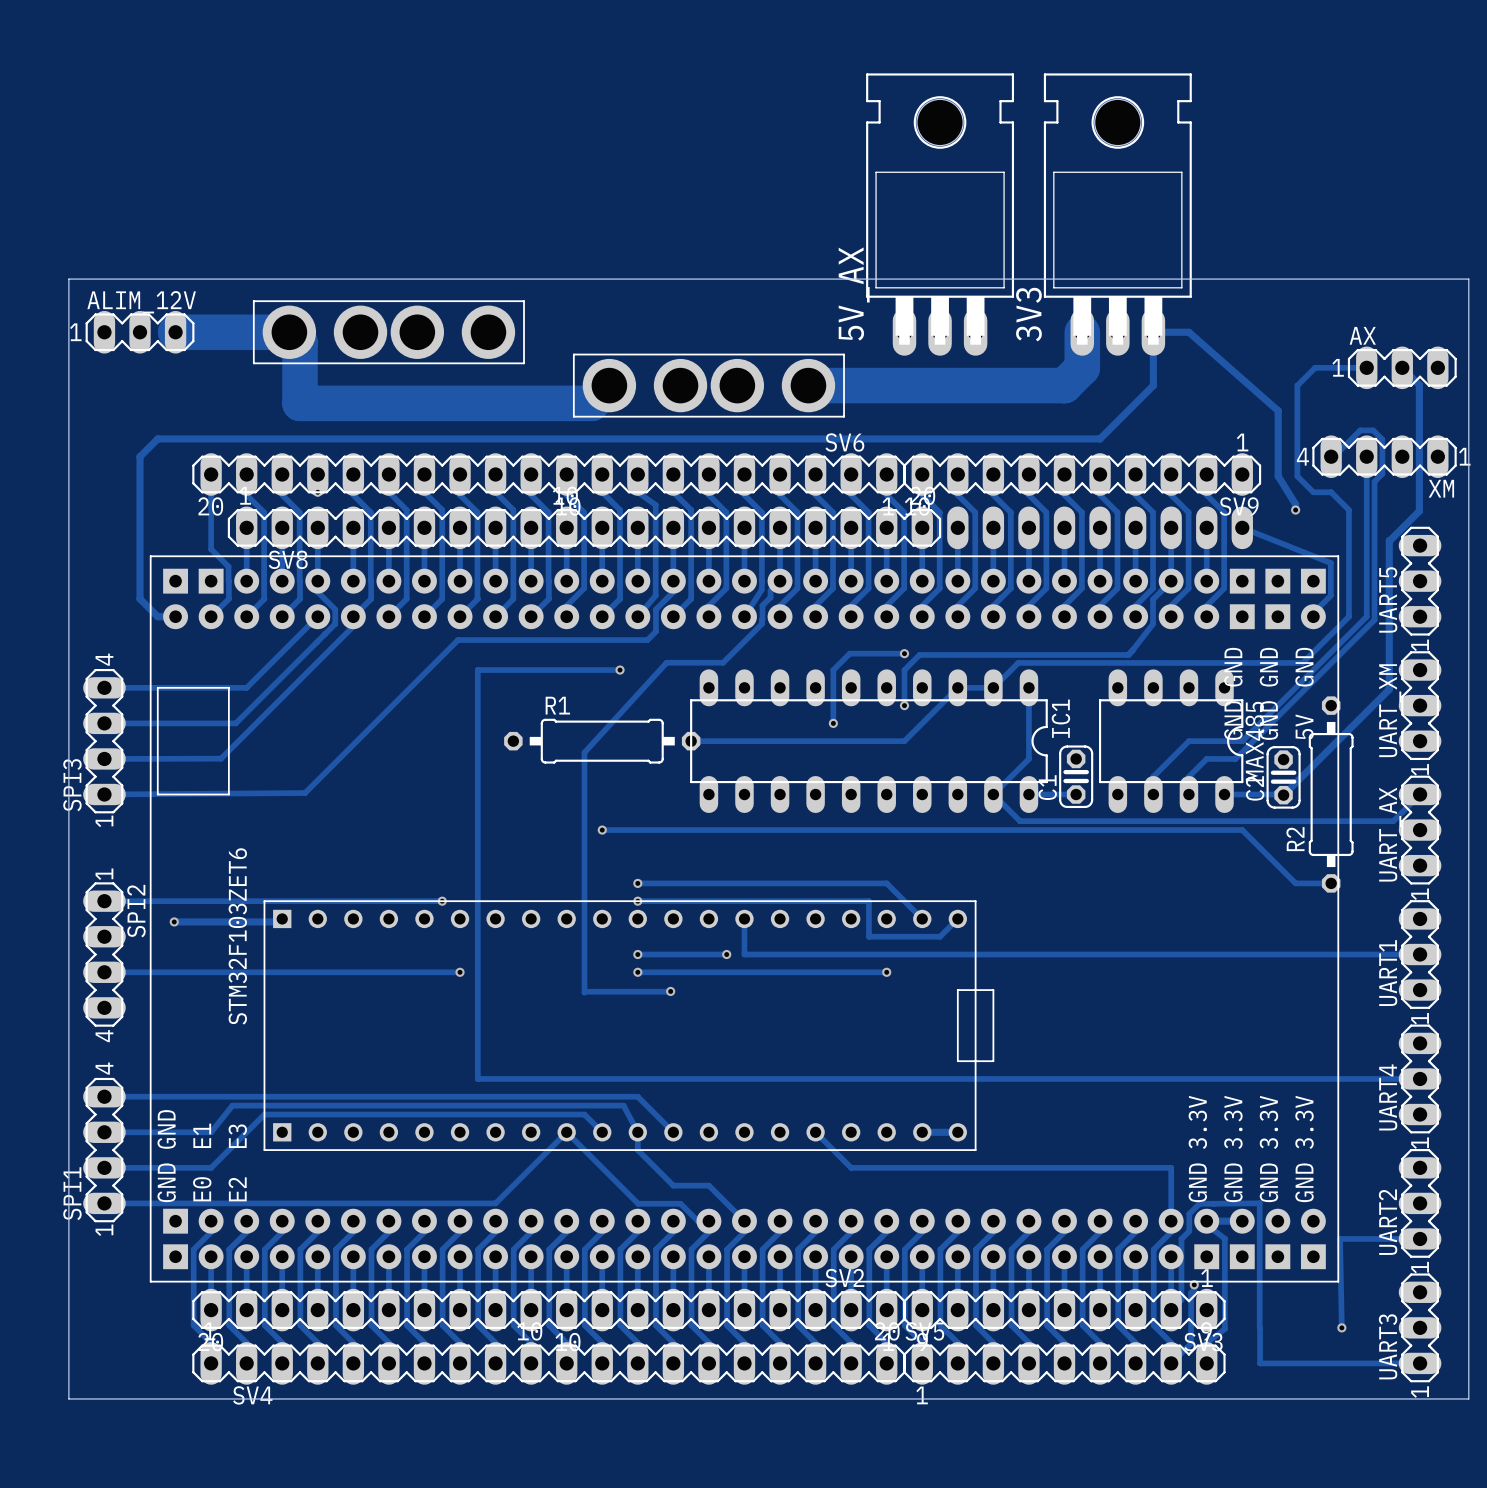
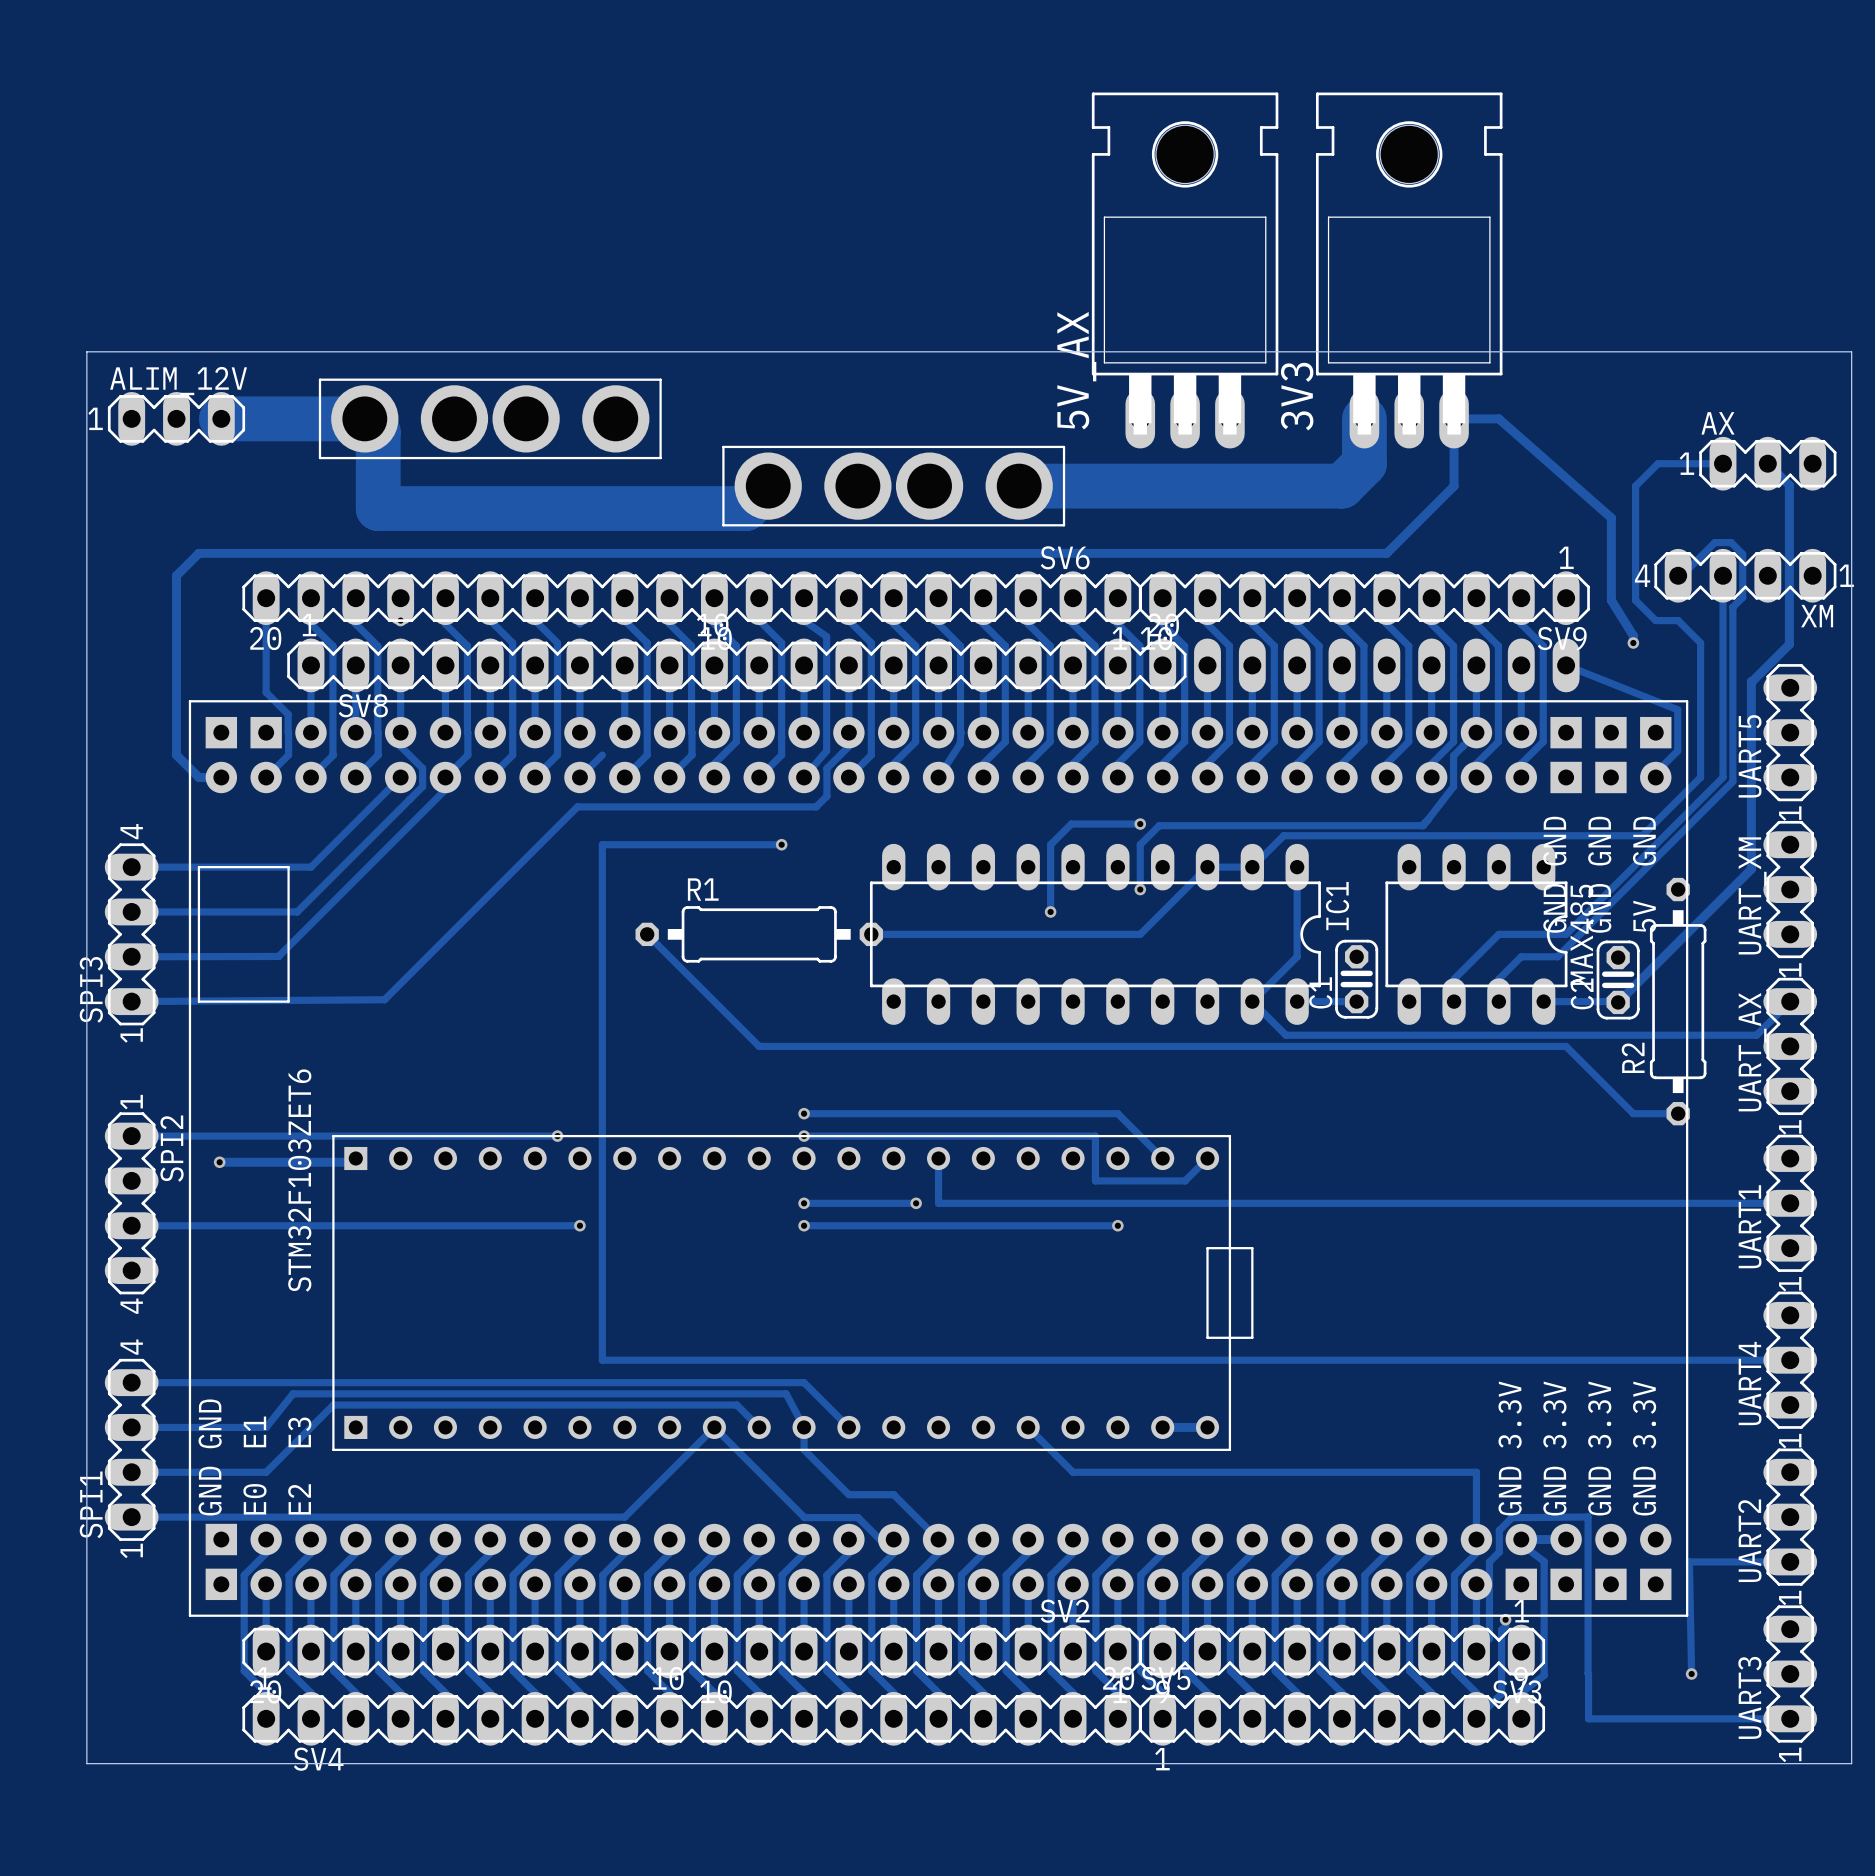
track: (460, 495) (477, 512) (477, 598) -> none
track: (780, 581) (770, 590) (770, 597) (762, 605) (761, 623) (723, 662) (666, 662) (584, 752) (584, 992) (670, 991) -> none
track: none -> (647, 934) (759, 1046)
via: (602, 830) -> none
via: (670, 991) -> none

